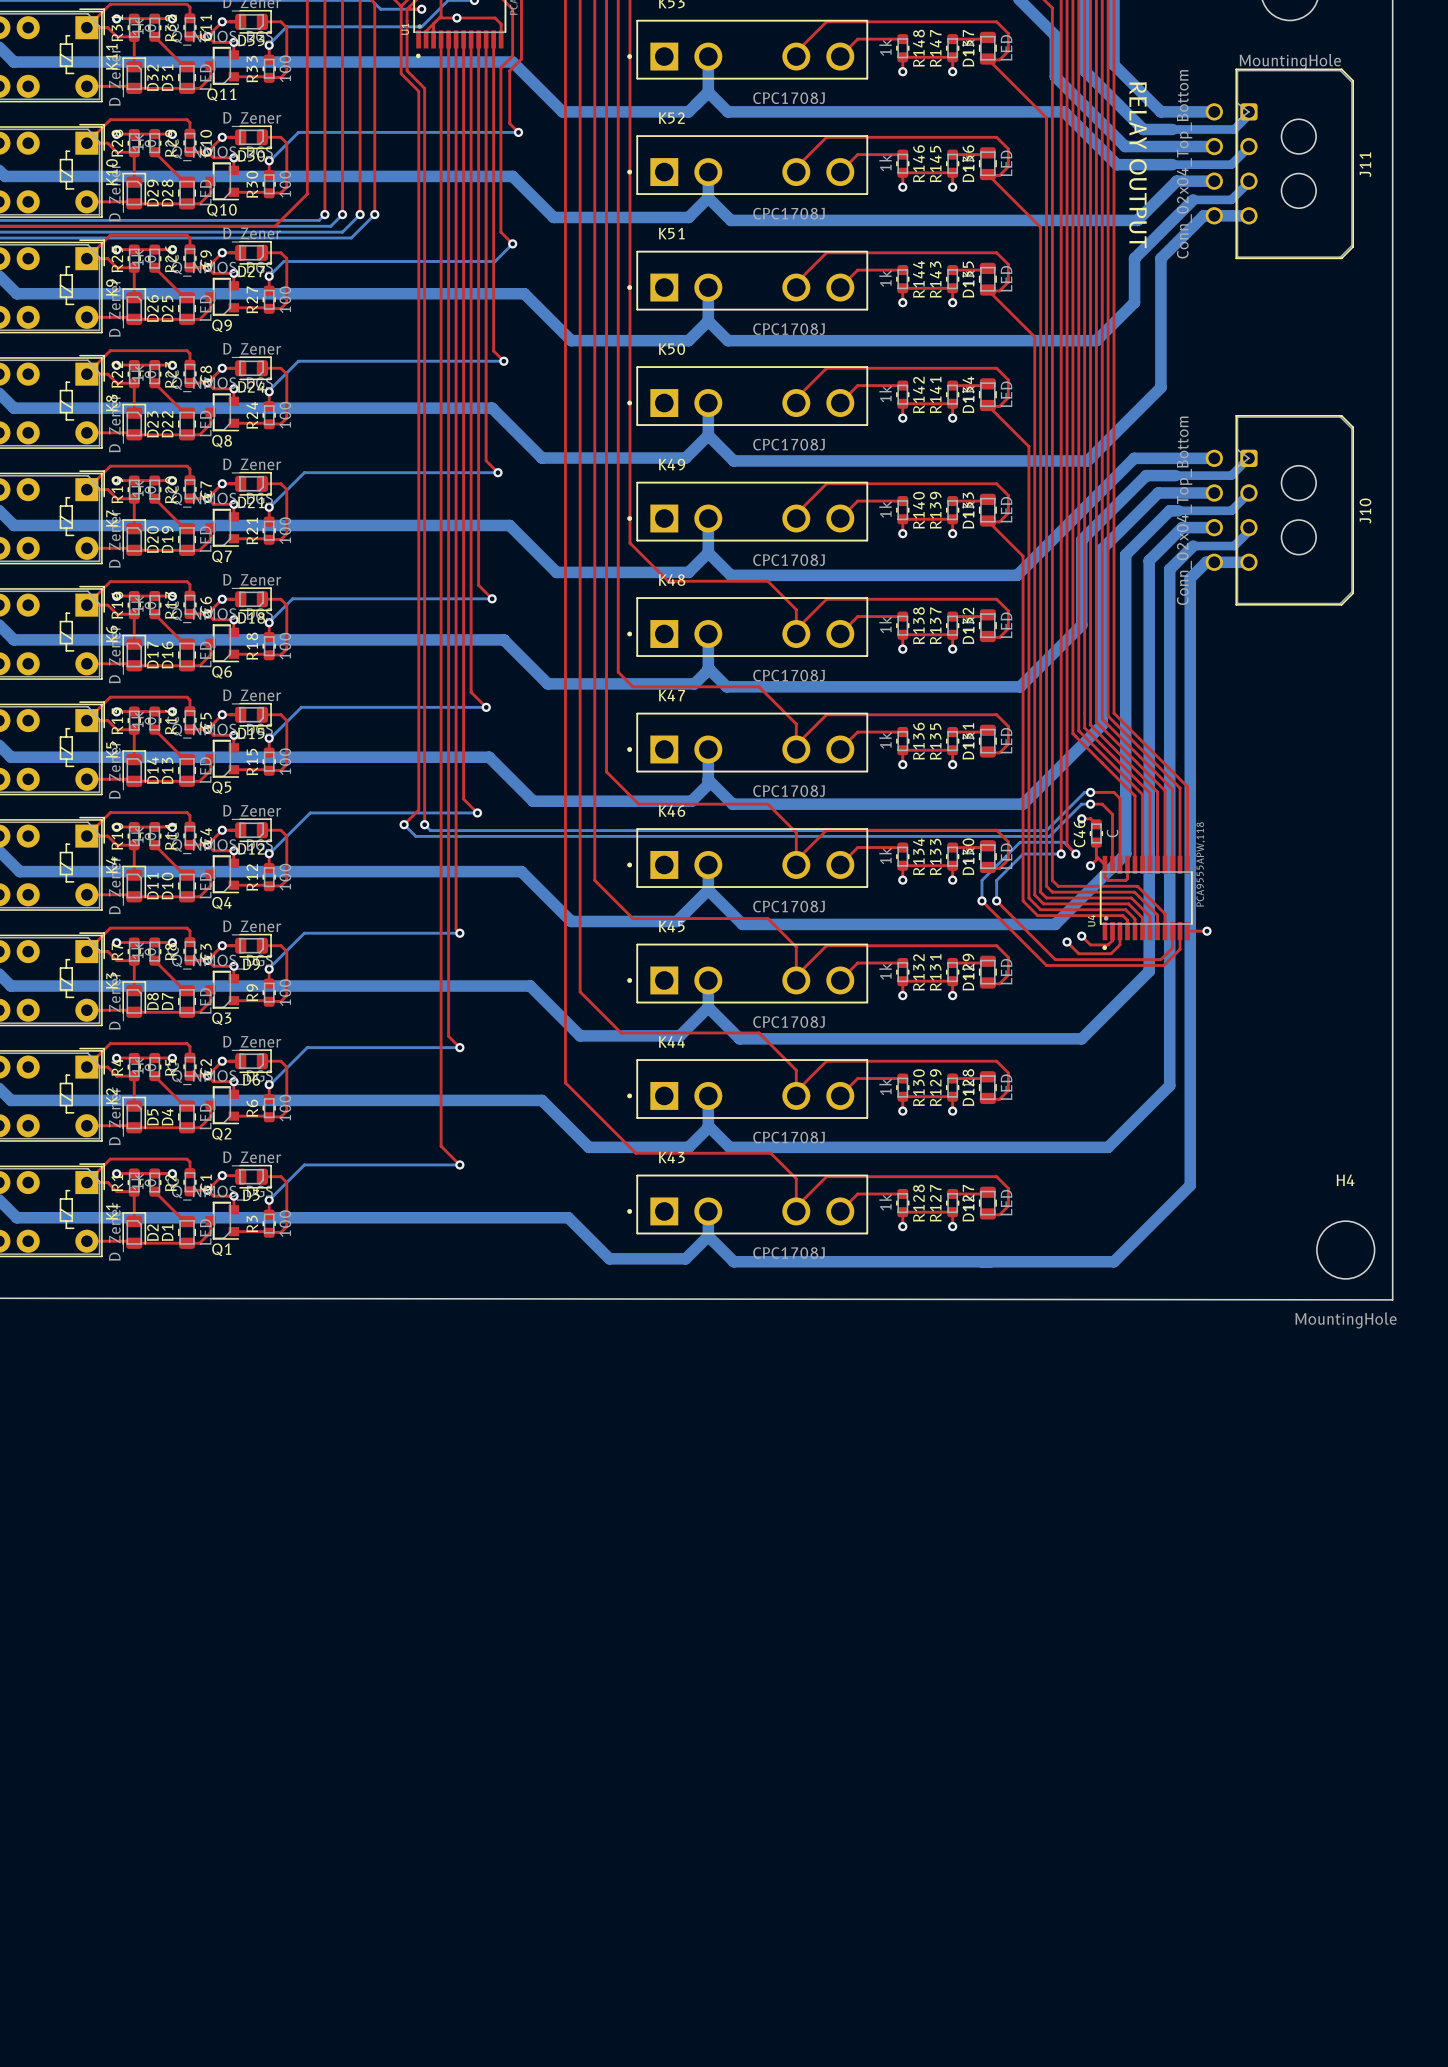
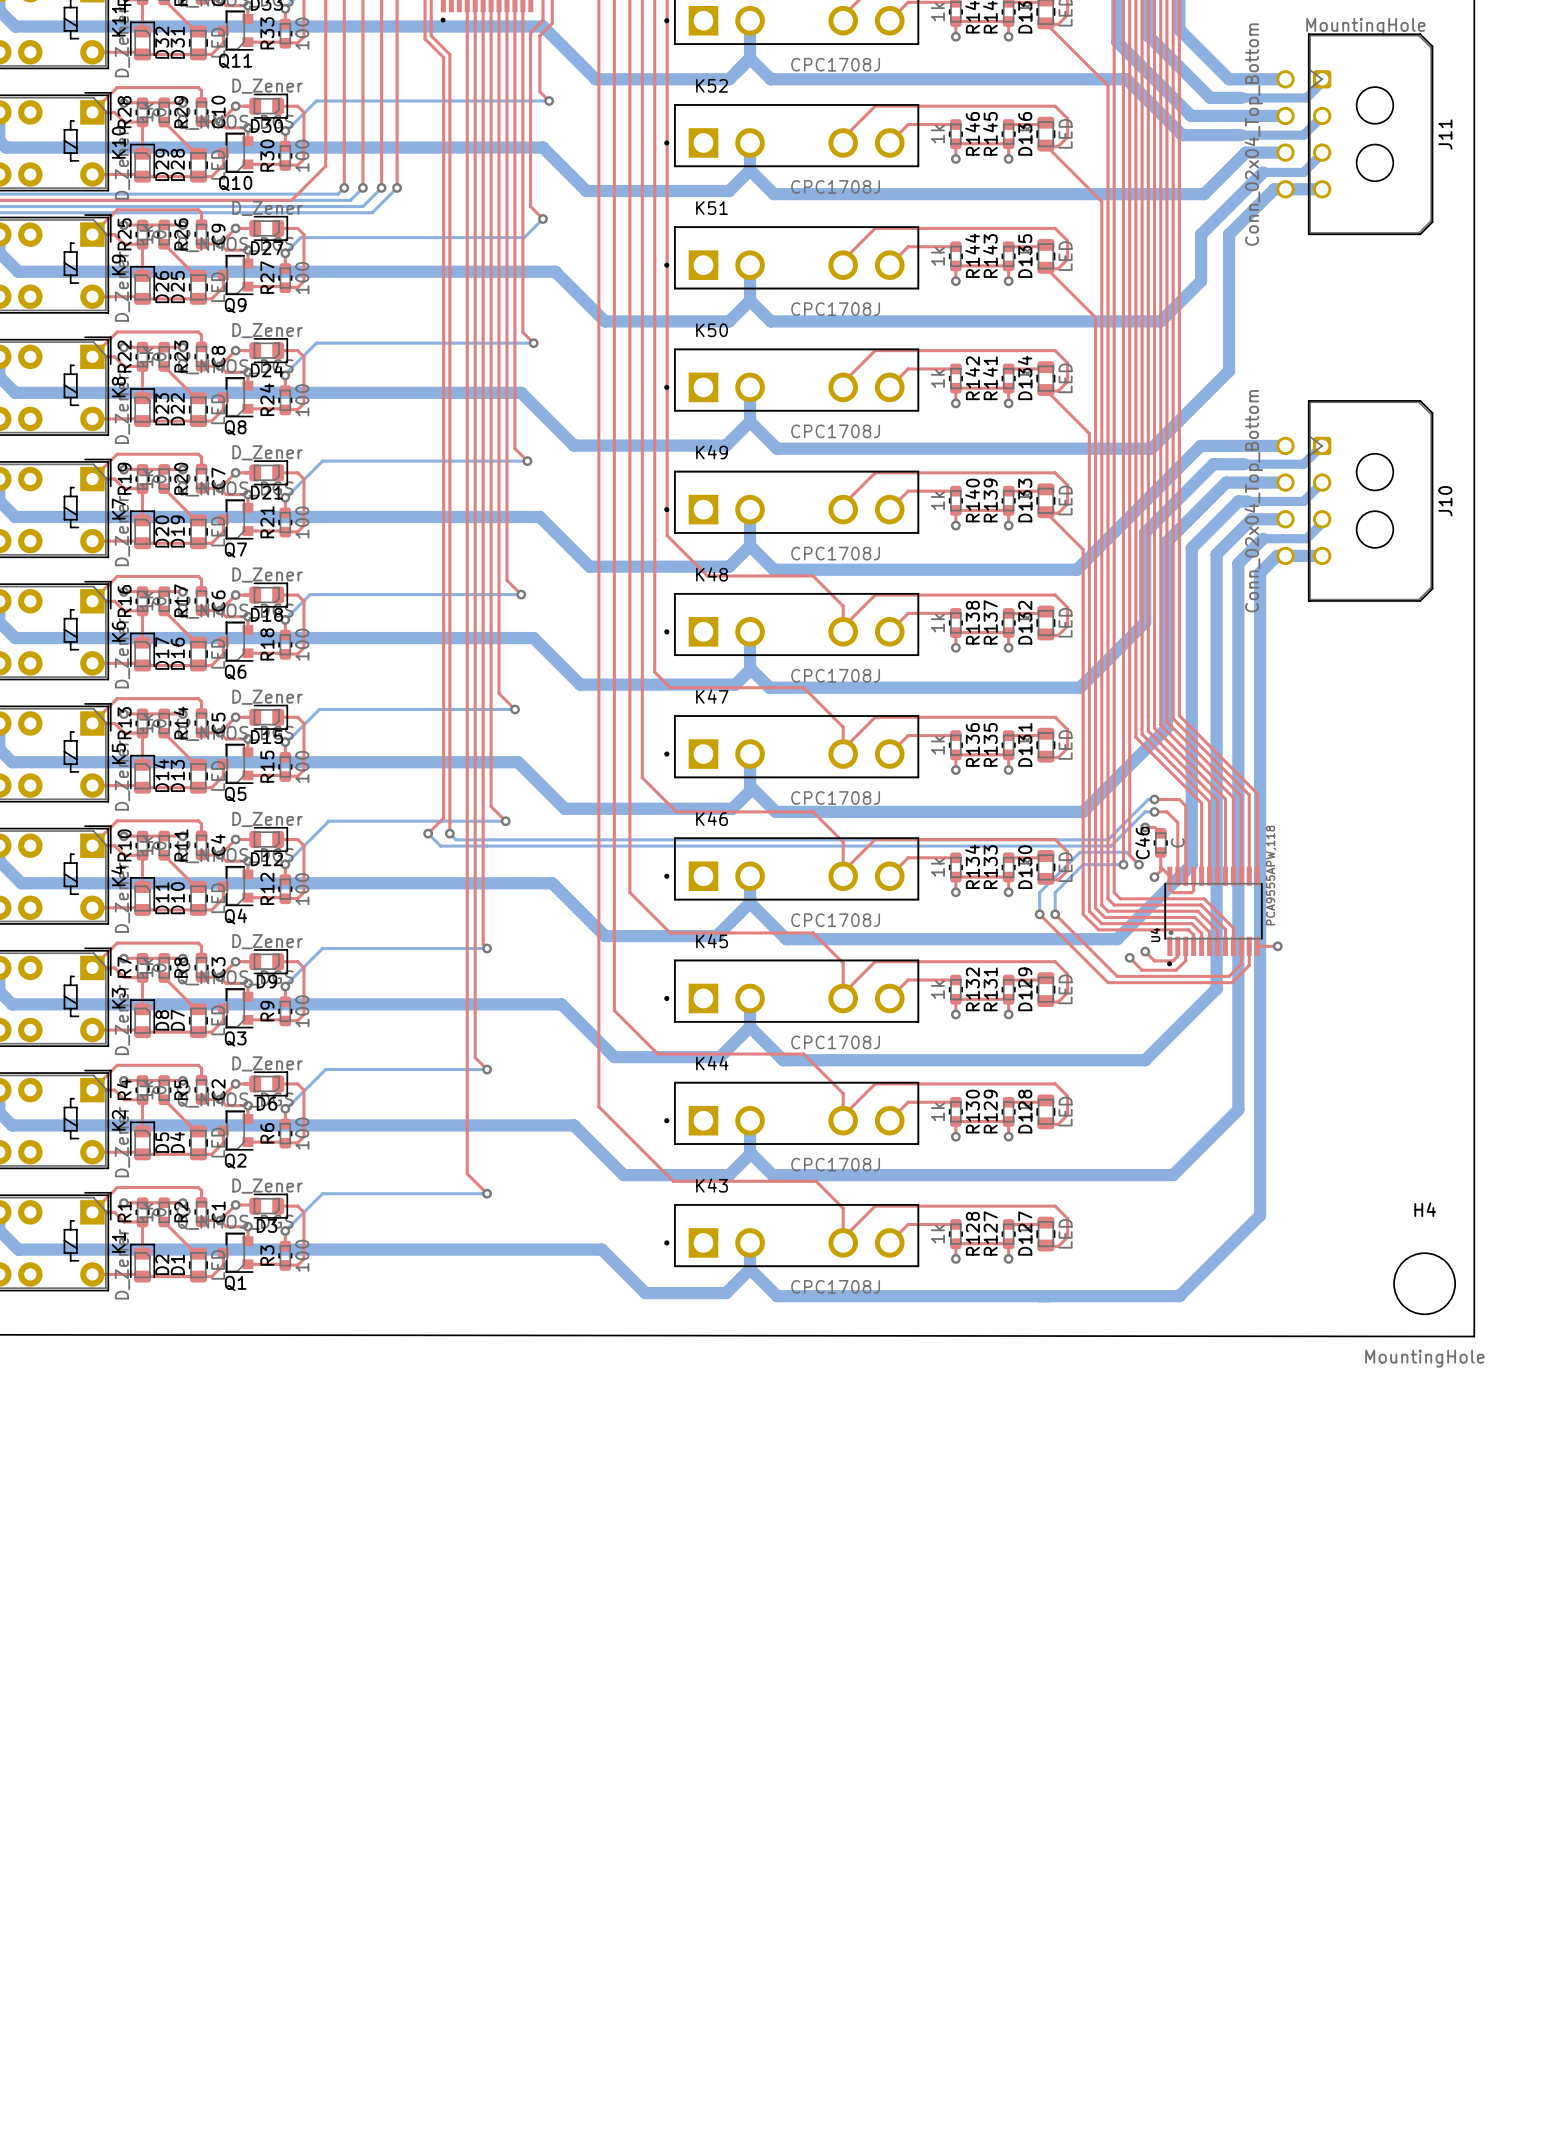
text: RELAY OUTPUT (1138, 165) -> none

